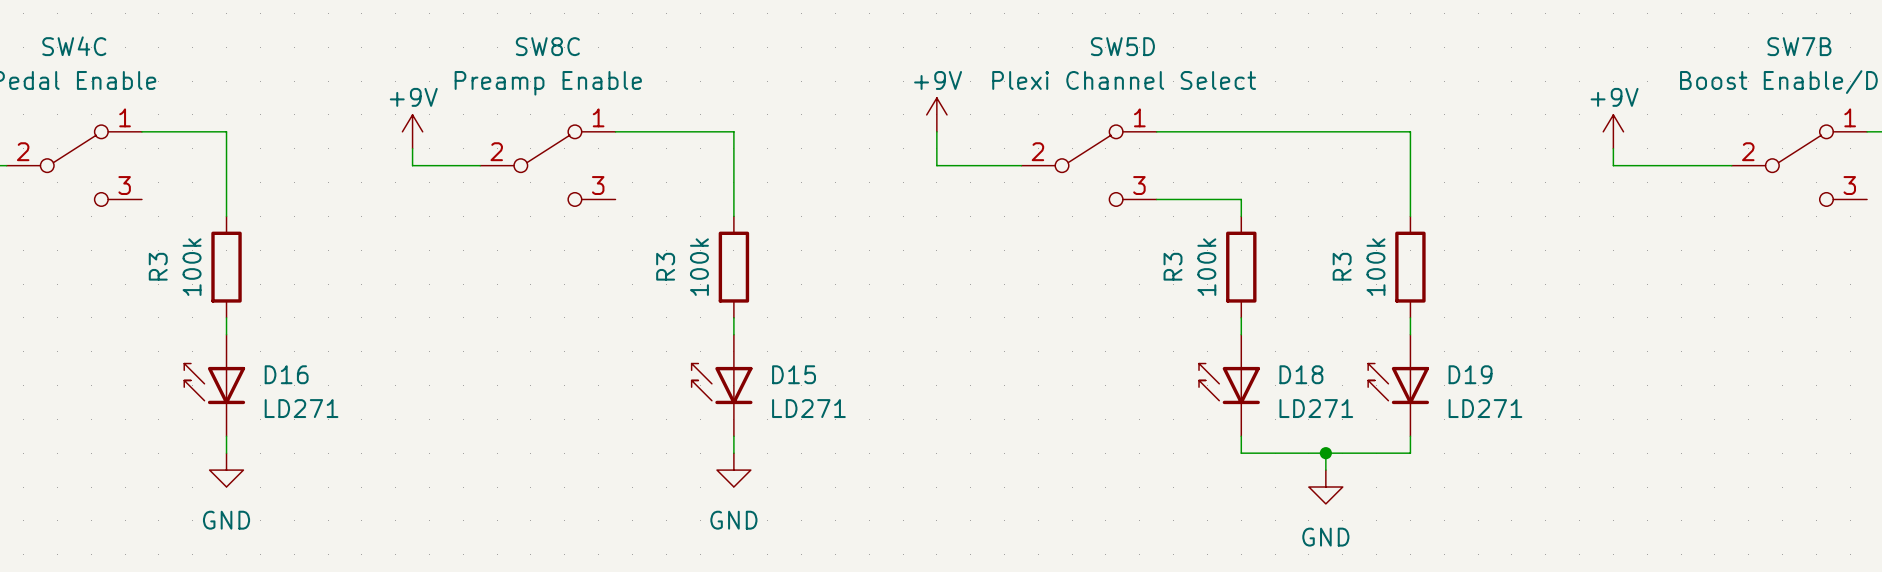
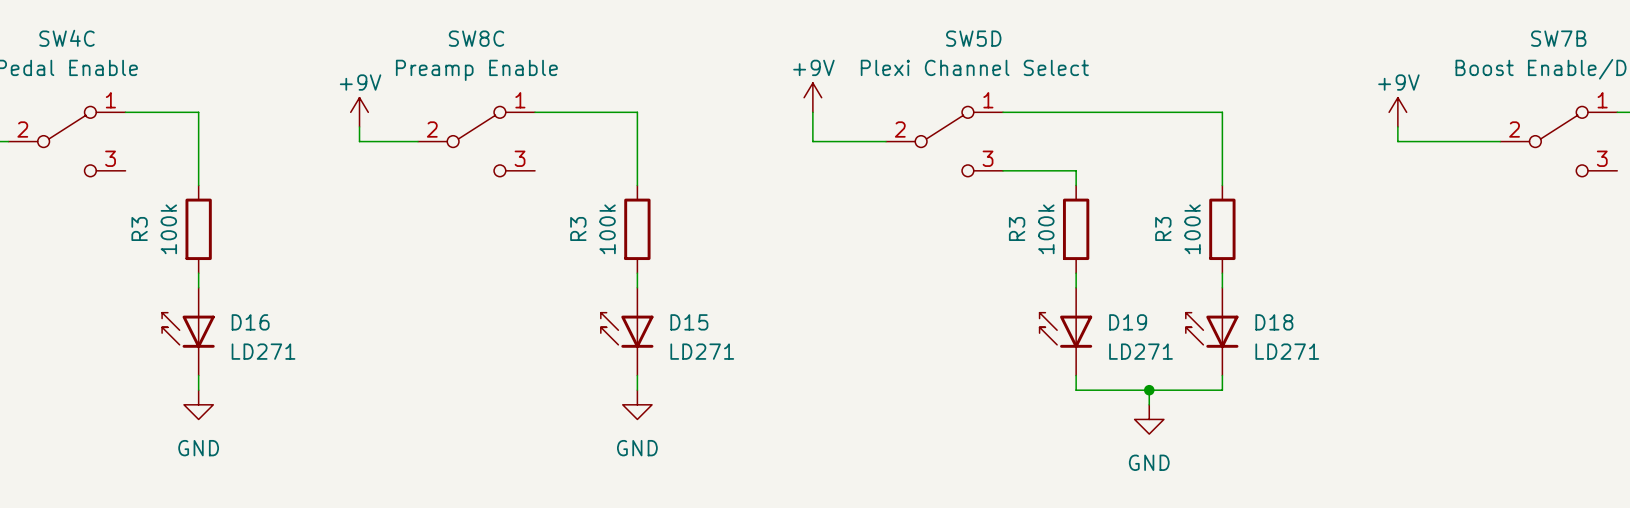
D18 name: D18 (1301, 374) -> D19 (1128, 322)
D19 name: D19 (1470, 374) -> D18 (1274, 322)

